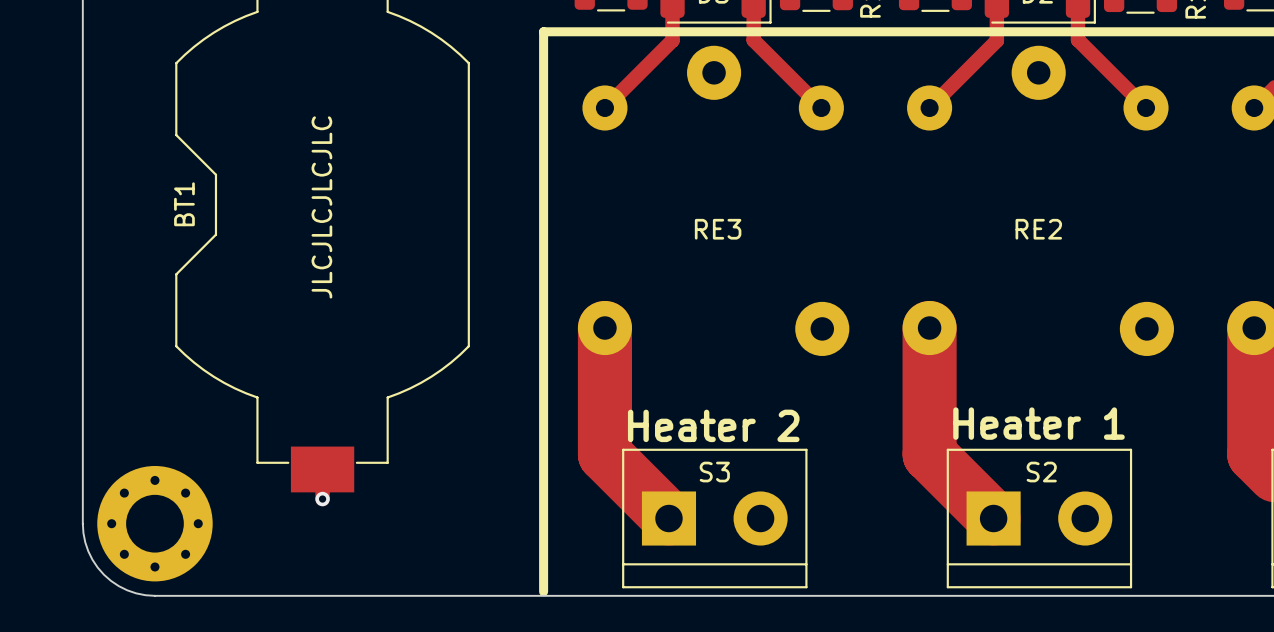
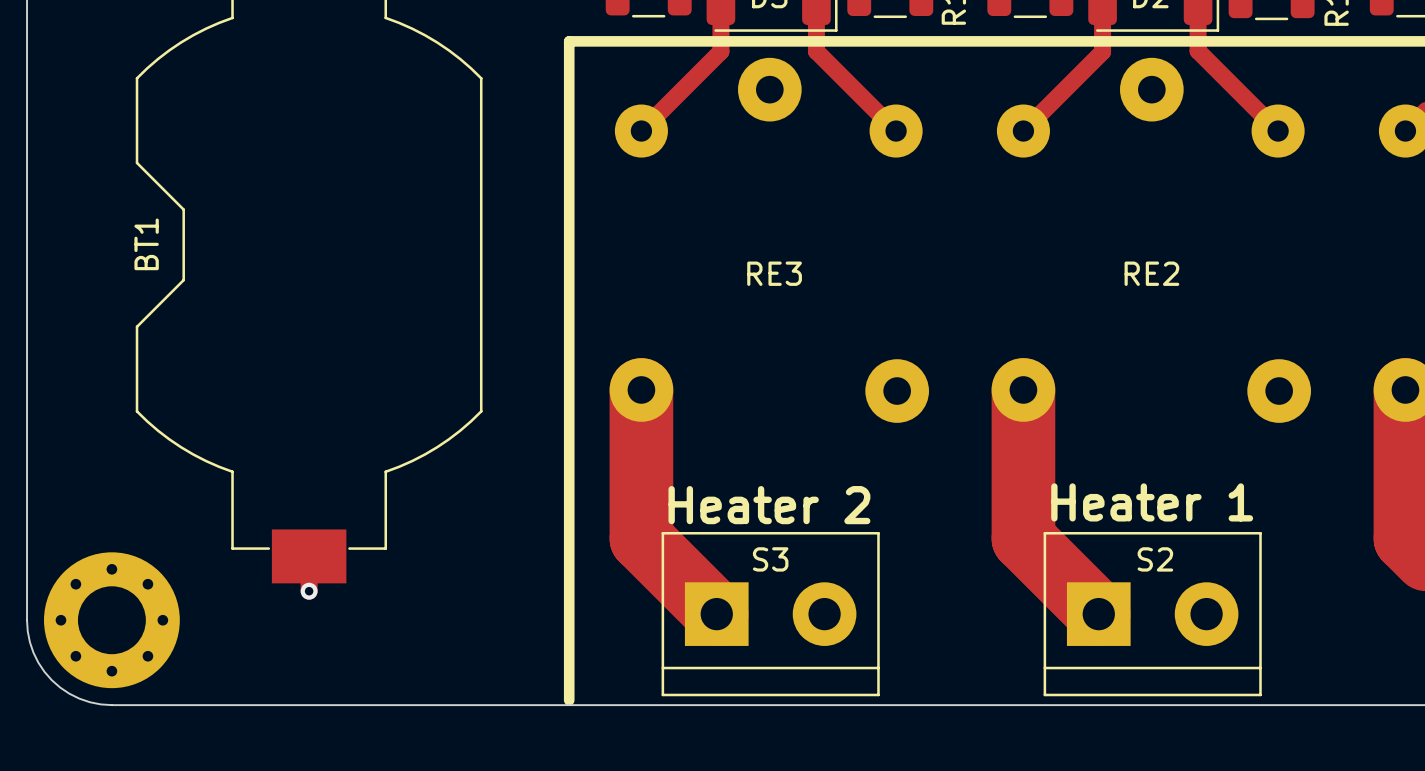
text: JLCJLCJLCJLC (321, 207) -> none

